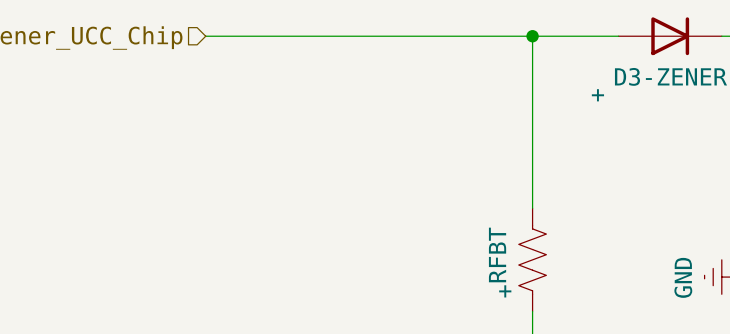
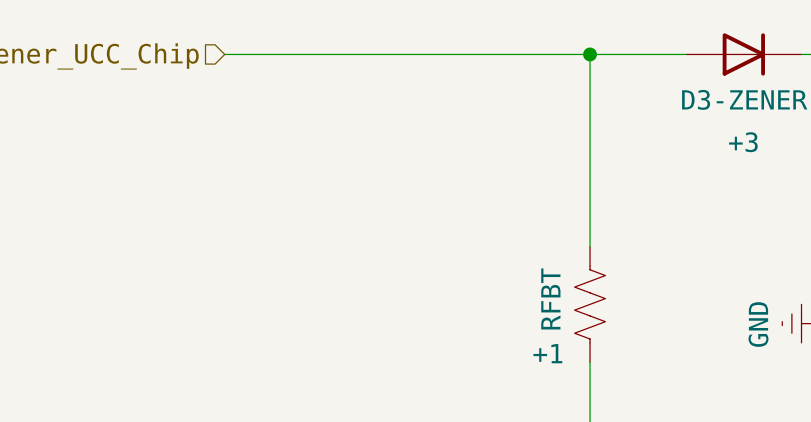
+3 name: + (597, 95) -> +3 (743, 142)
+1 name: + (505, 291) -> +1 (547, 353)

